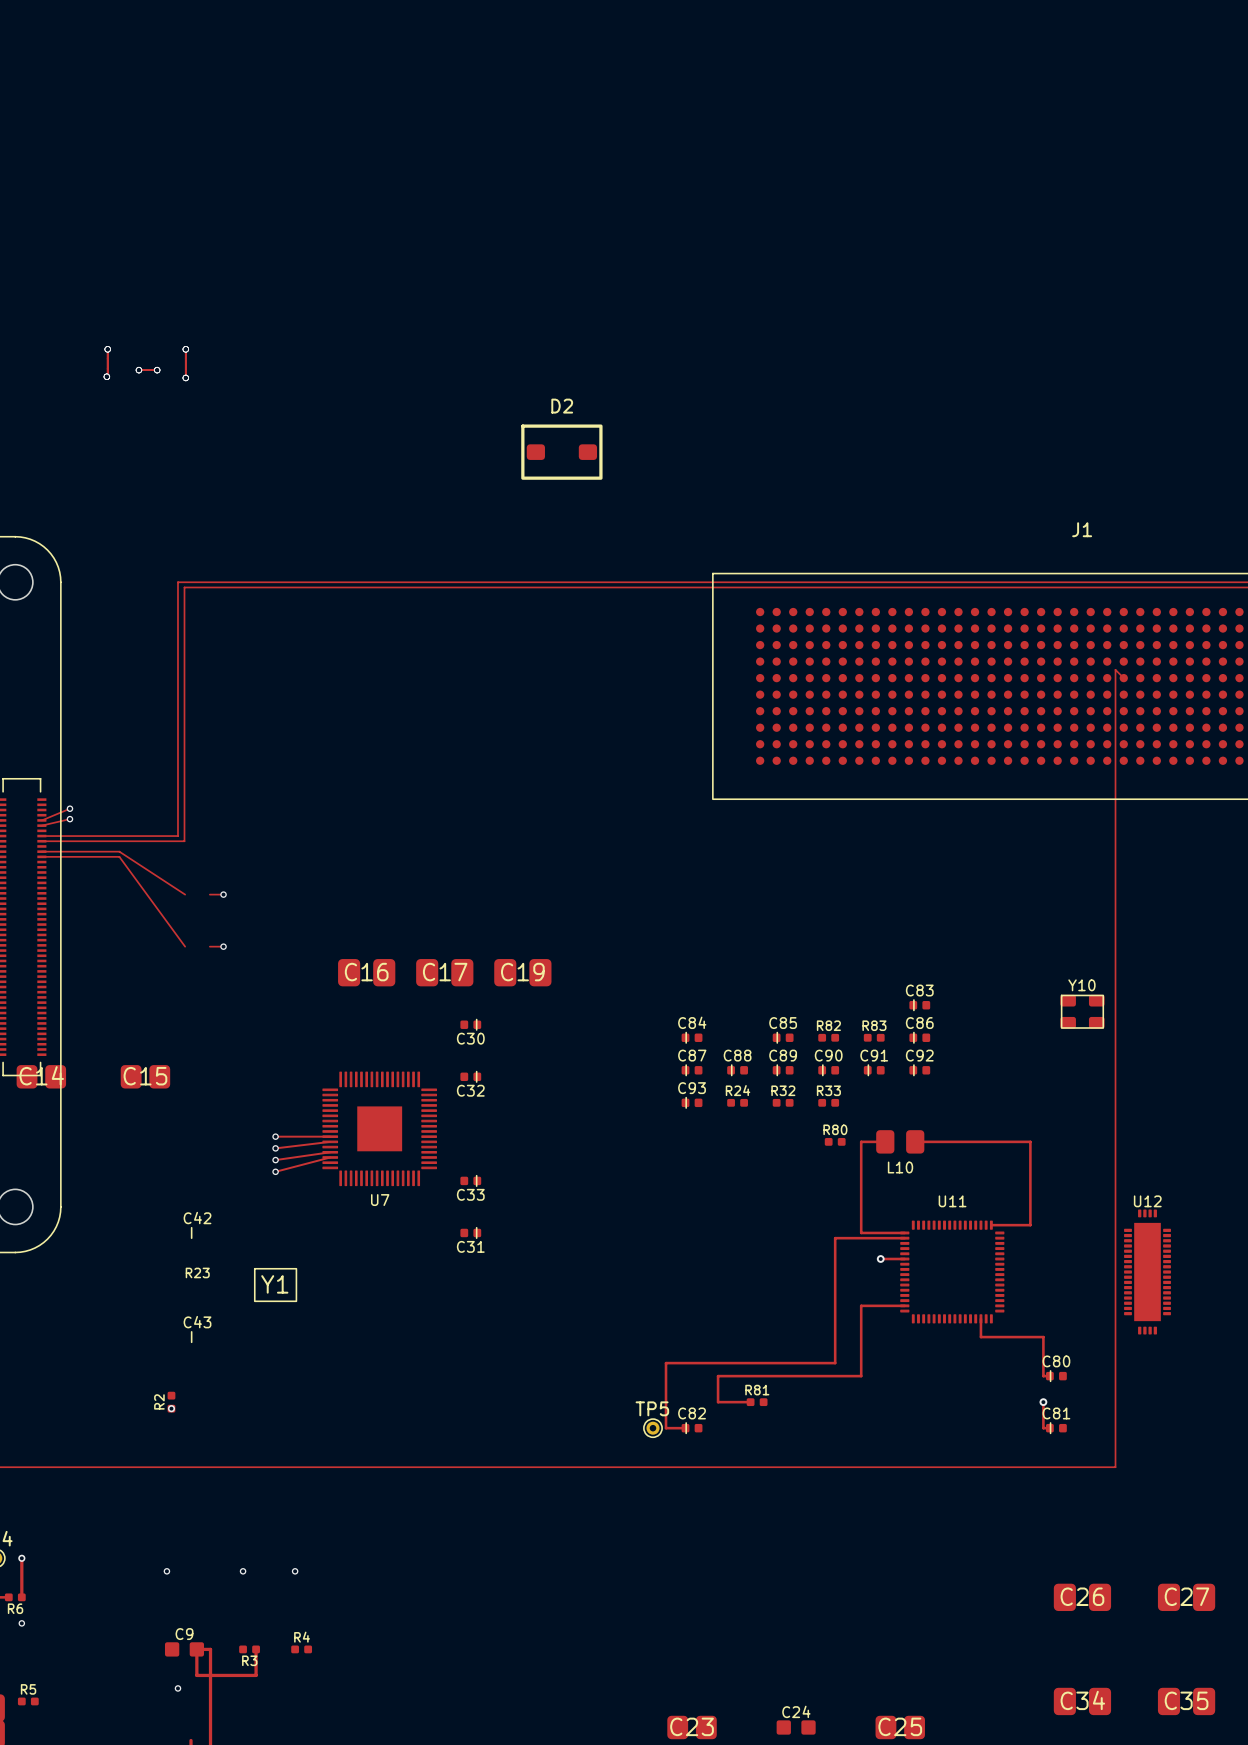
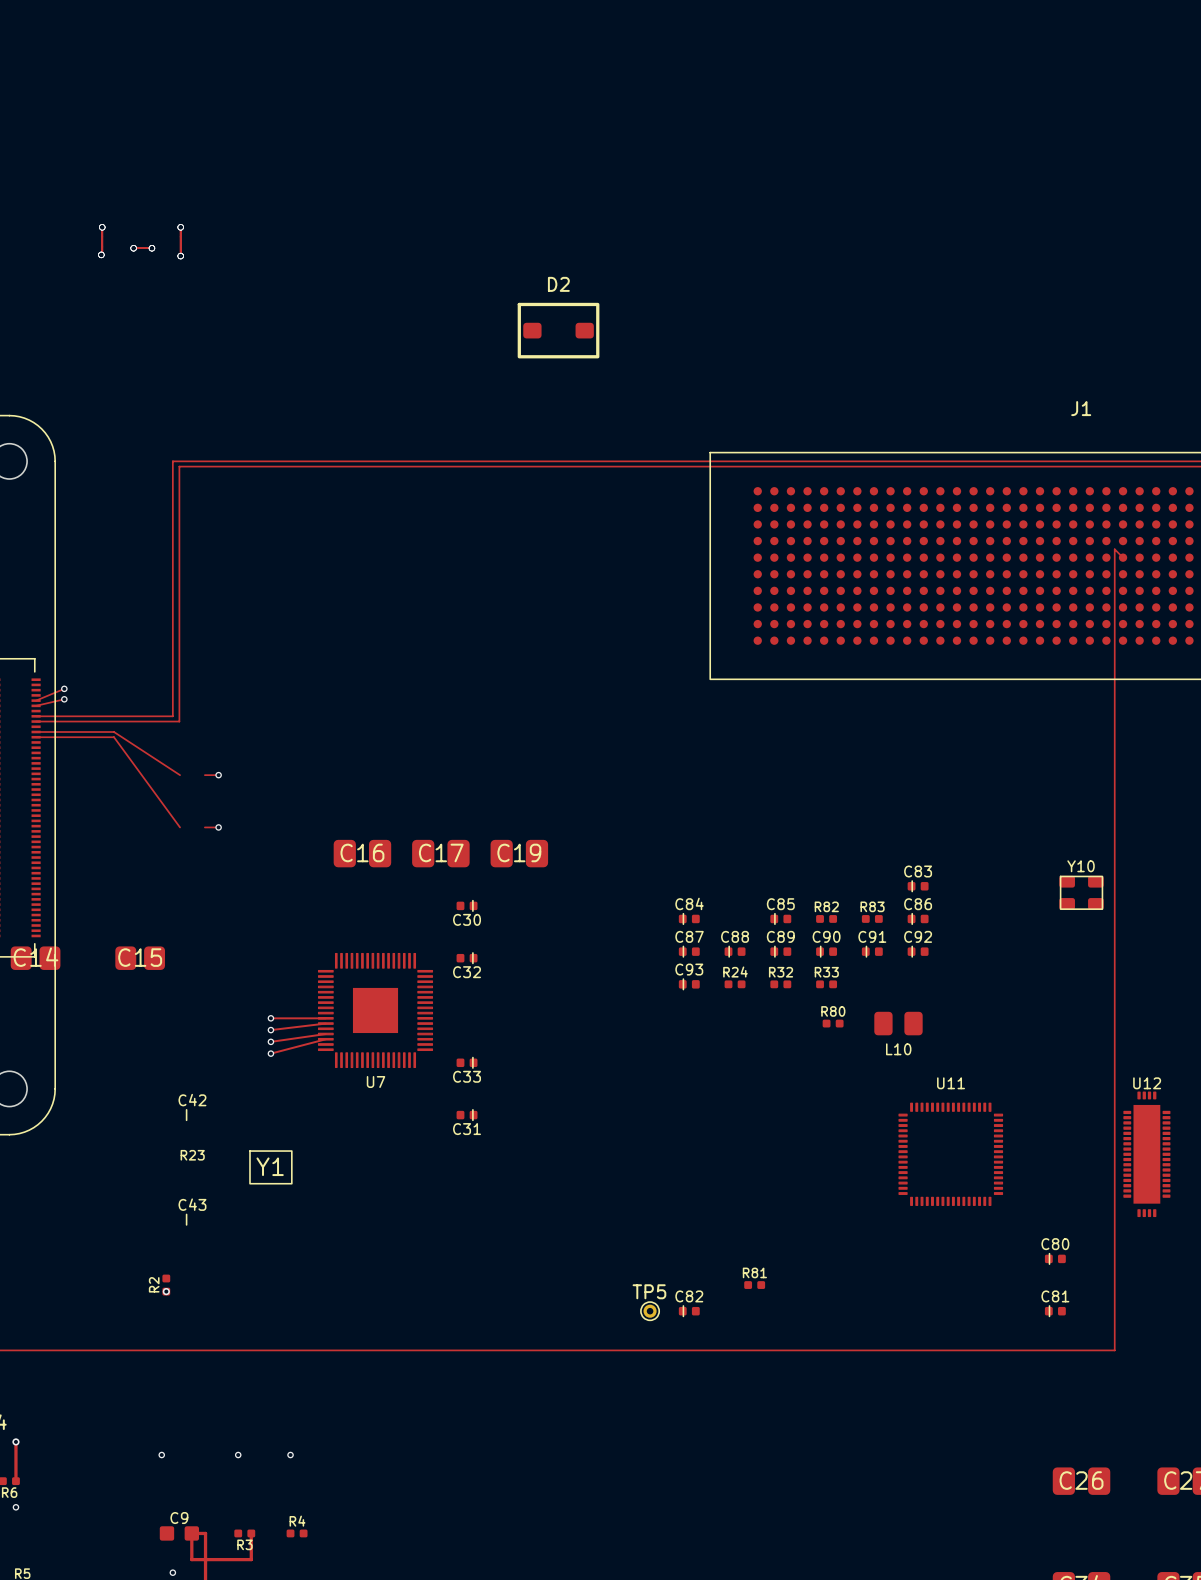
track: (885, 1141) (861, 1141) (861, 1232) (904, 1232) -> none
track: (915, 1141) (1030, 1141) (1030, 1225) (991, 1225) -> none
track: (904, 1238) (835, 1238) (835, 1363) (666, 1363) (666, 1428) (685, 1428) -> none
track: (880, 1258) (904, 1258) -> none
via: (880, 1258) -> none
track: (904, 1305) (861, 1305) (861, 1376) (718, 1376) (718, 1402) (750, 1402) -> none
track: (980, 1318) (980, 1337) (1043, 1337) (1043, 1376) (1049, 1376) -> none
track: (1043, 1402) (1043, 1428) (1049, 1428) -> none
via: (1043, 1402) -> none

